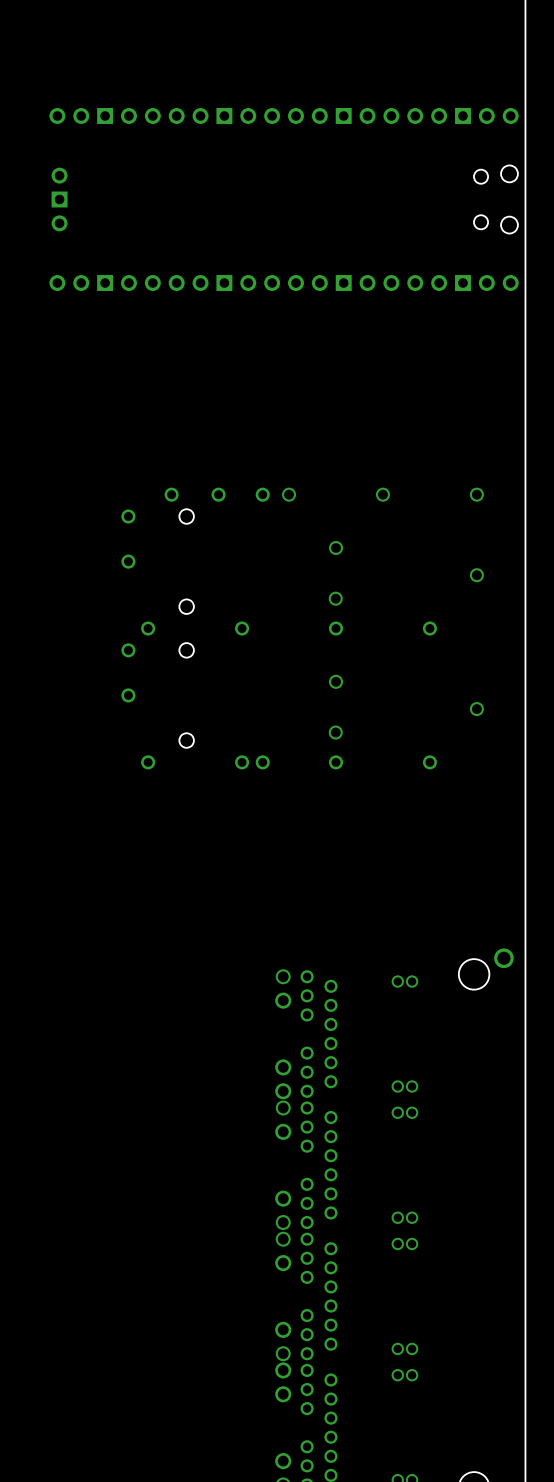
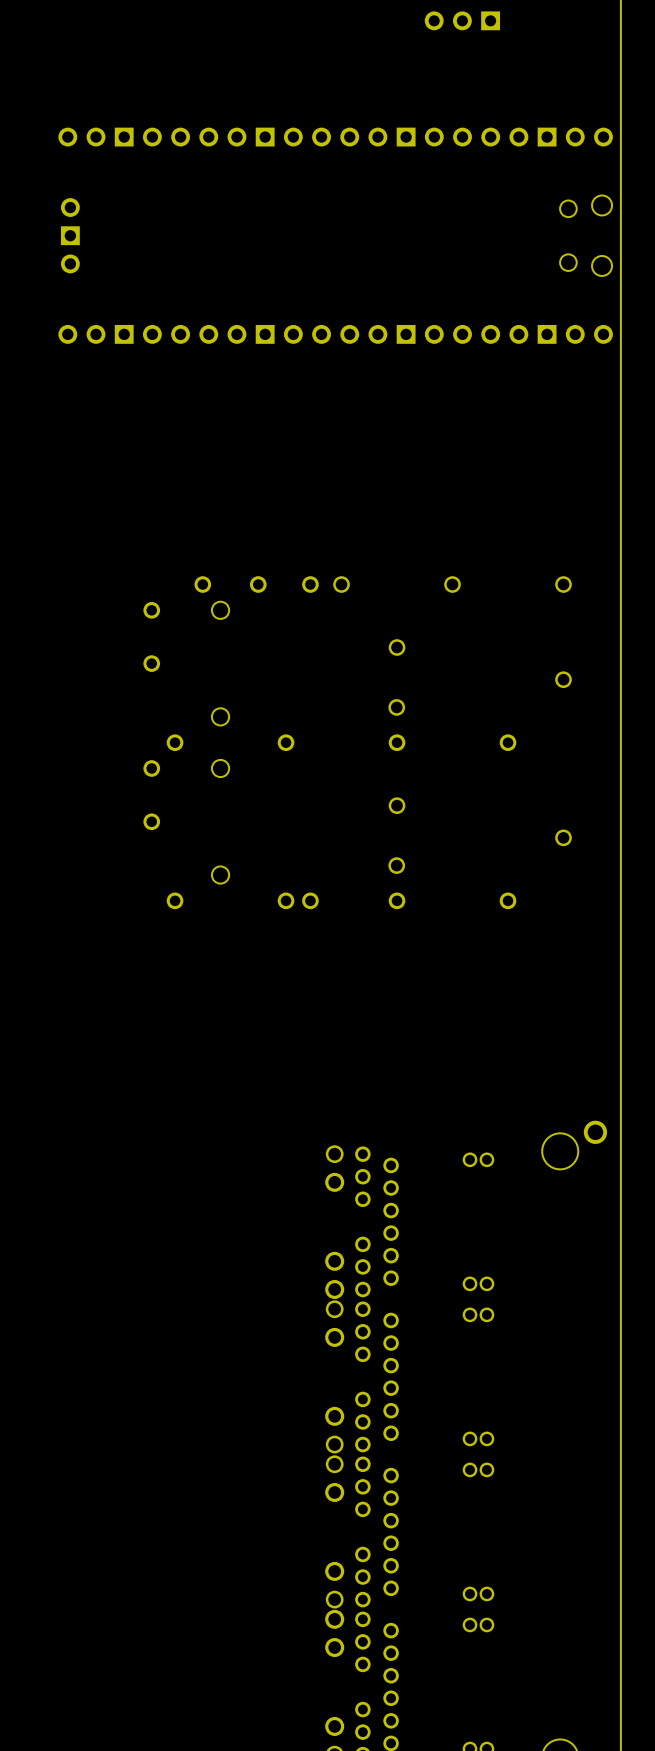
part: none -> (462, 20)

